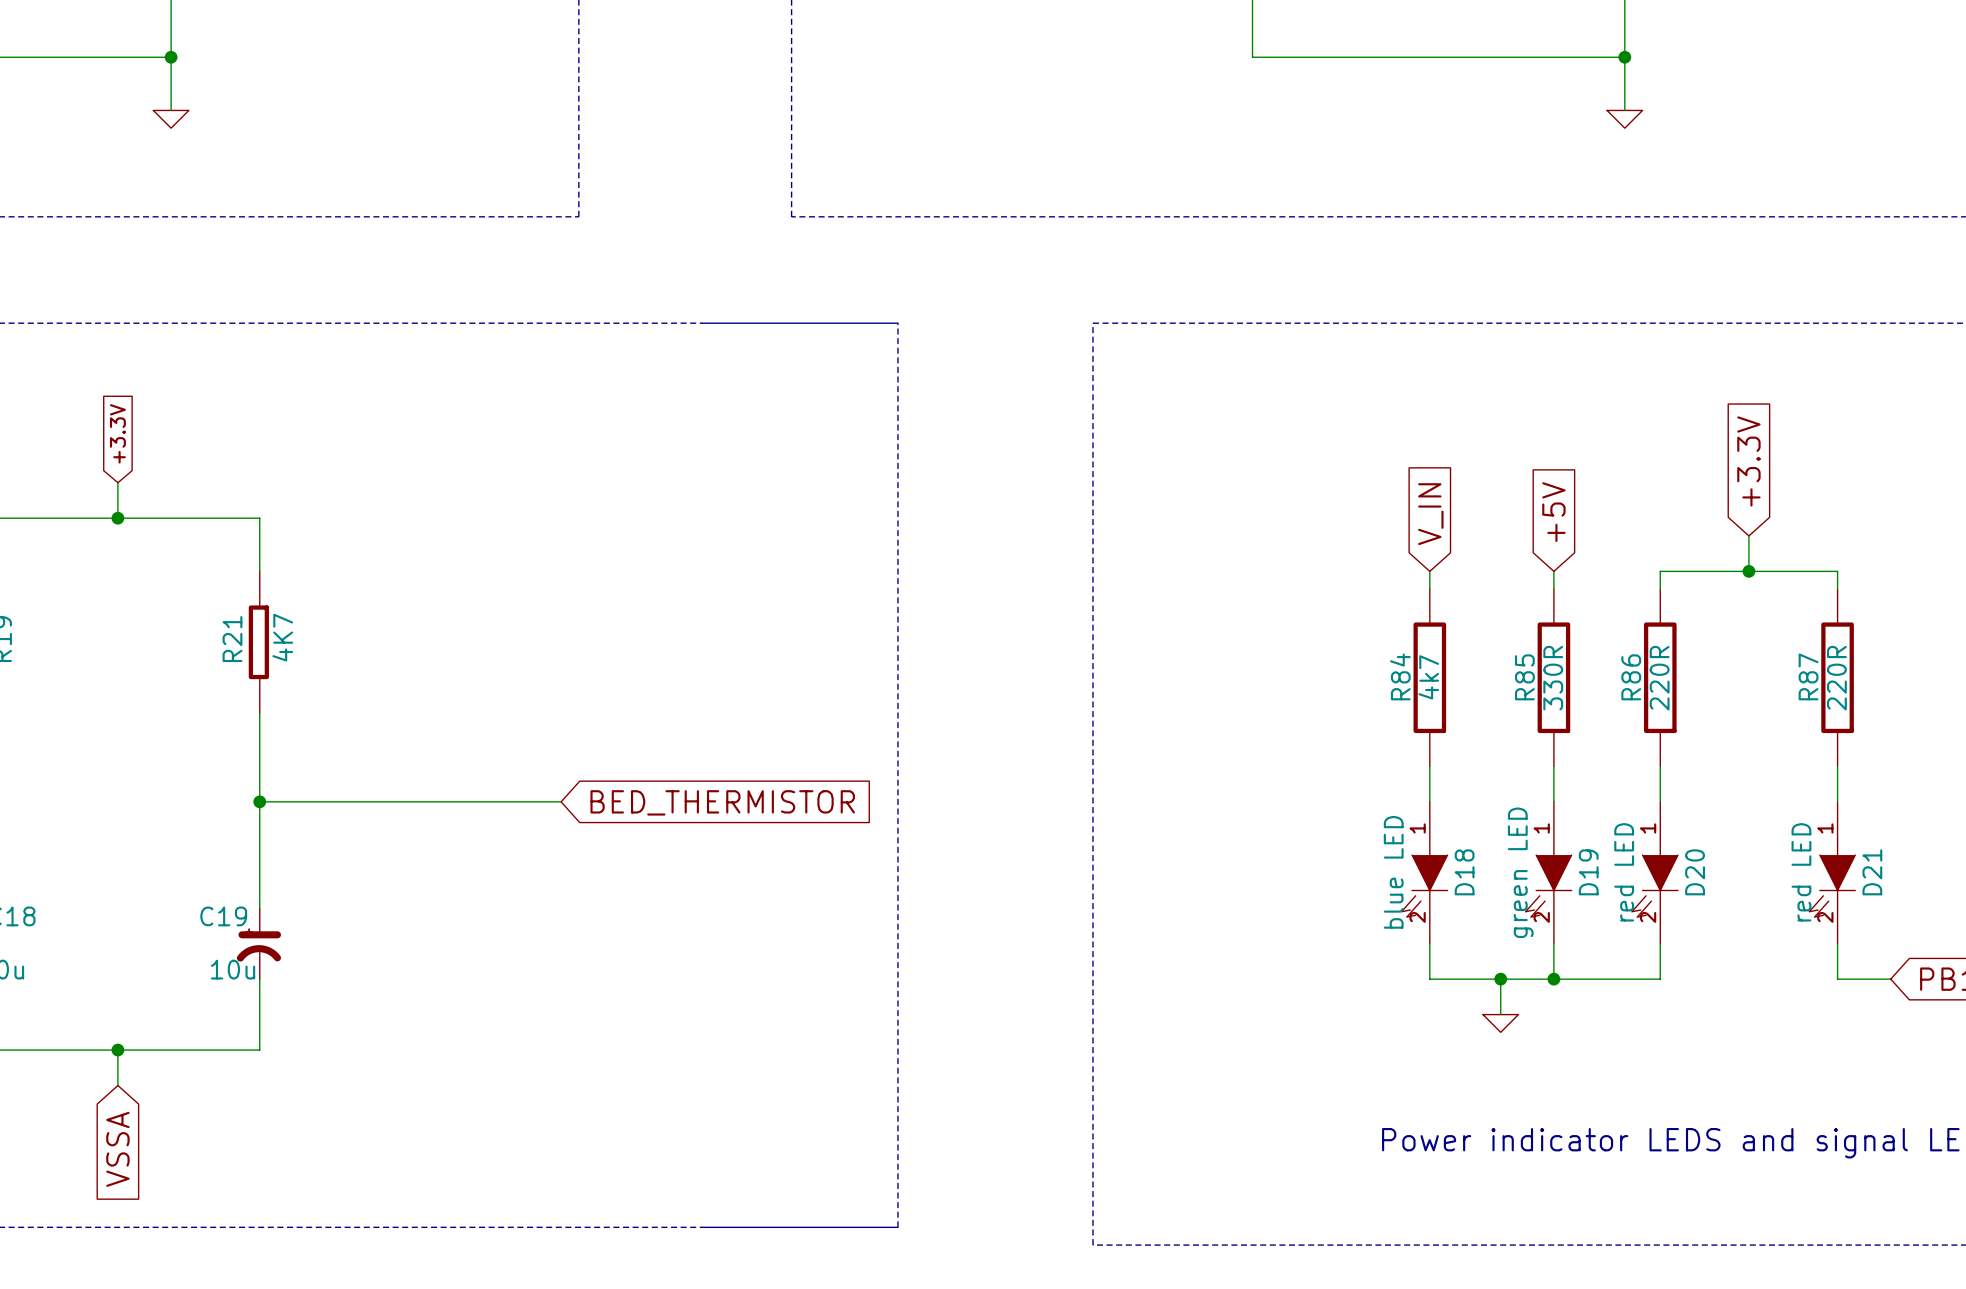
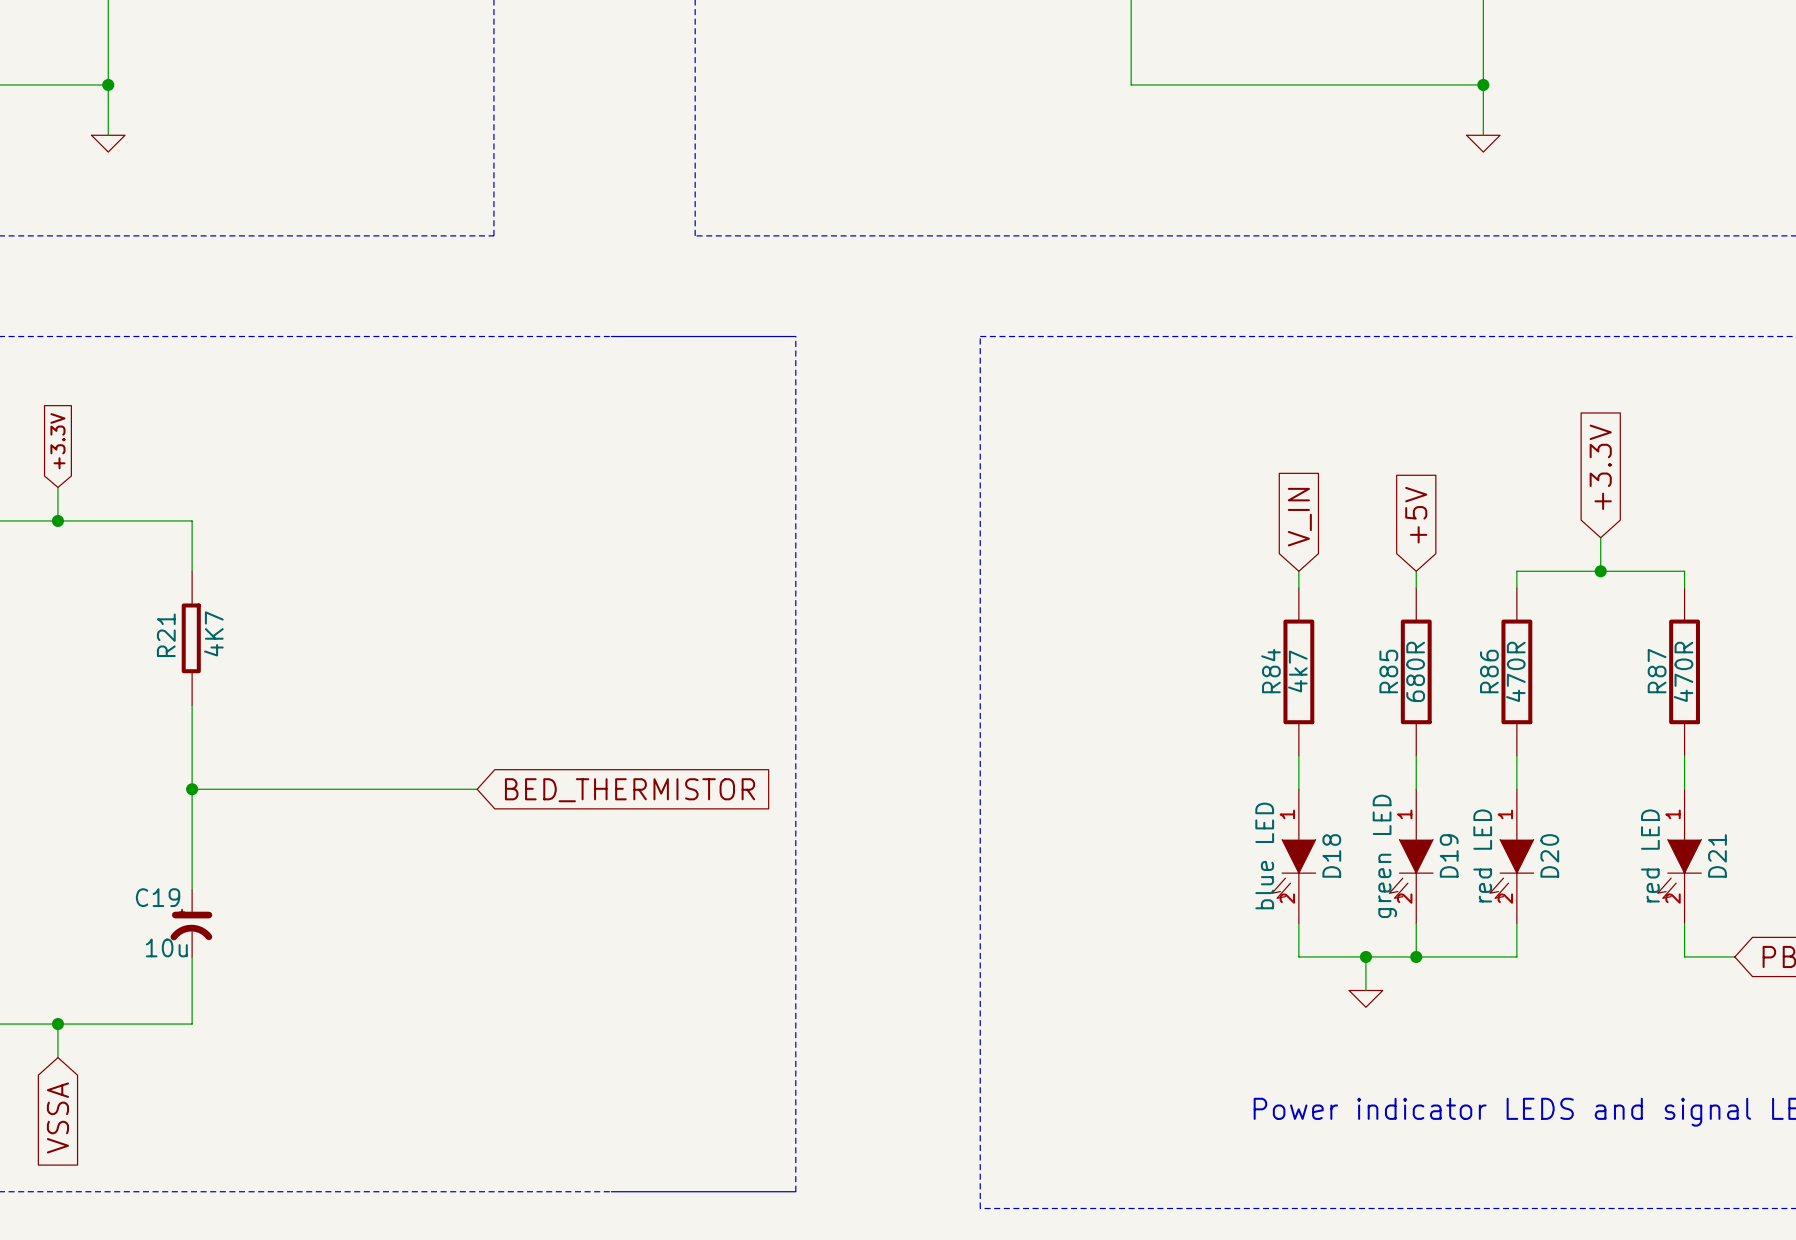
R85 value: 330R (1553, 678) -> 680R (1415, 671)
R86 value: 220R (1659, 678) -> 470R (1515, 671)
R87 value: 220R (1836, 678) -> 470R (1683, 671)

